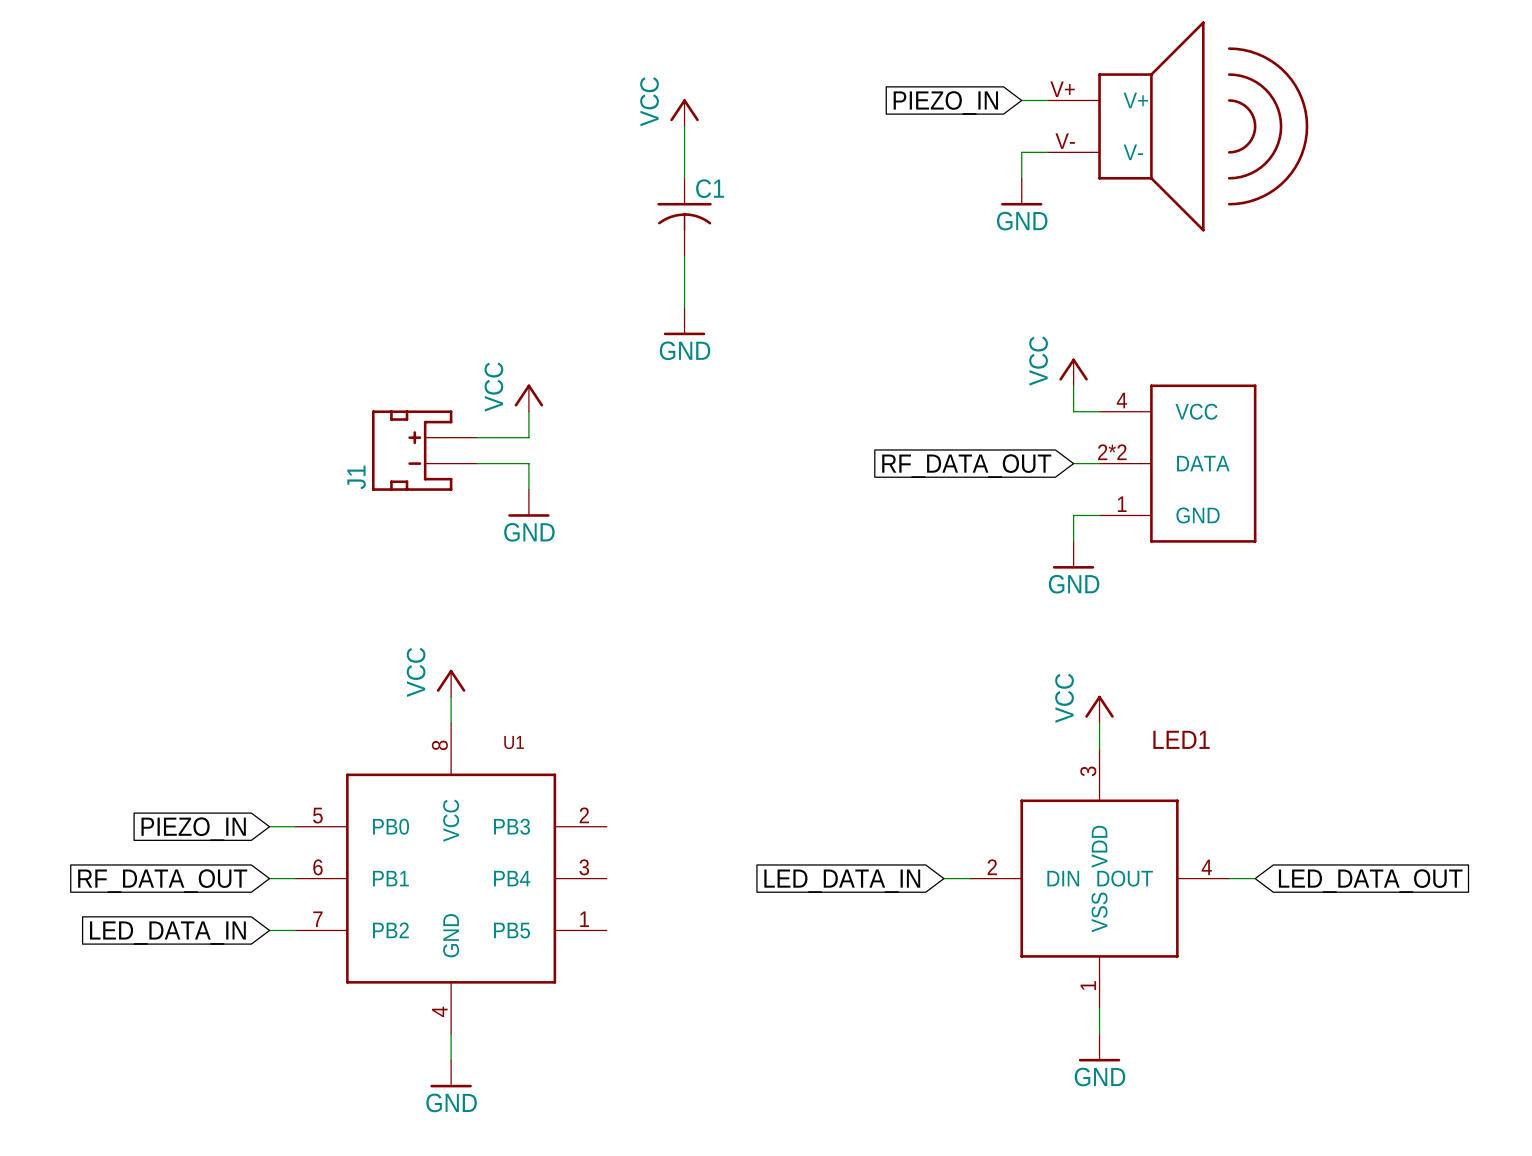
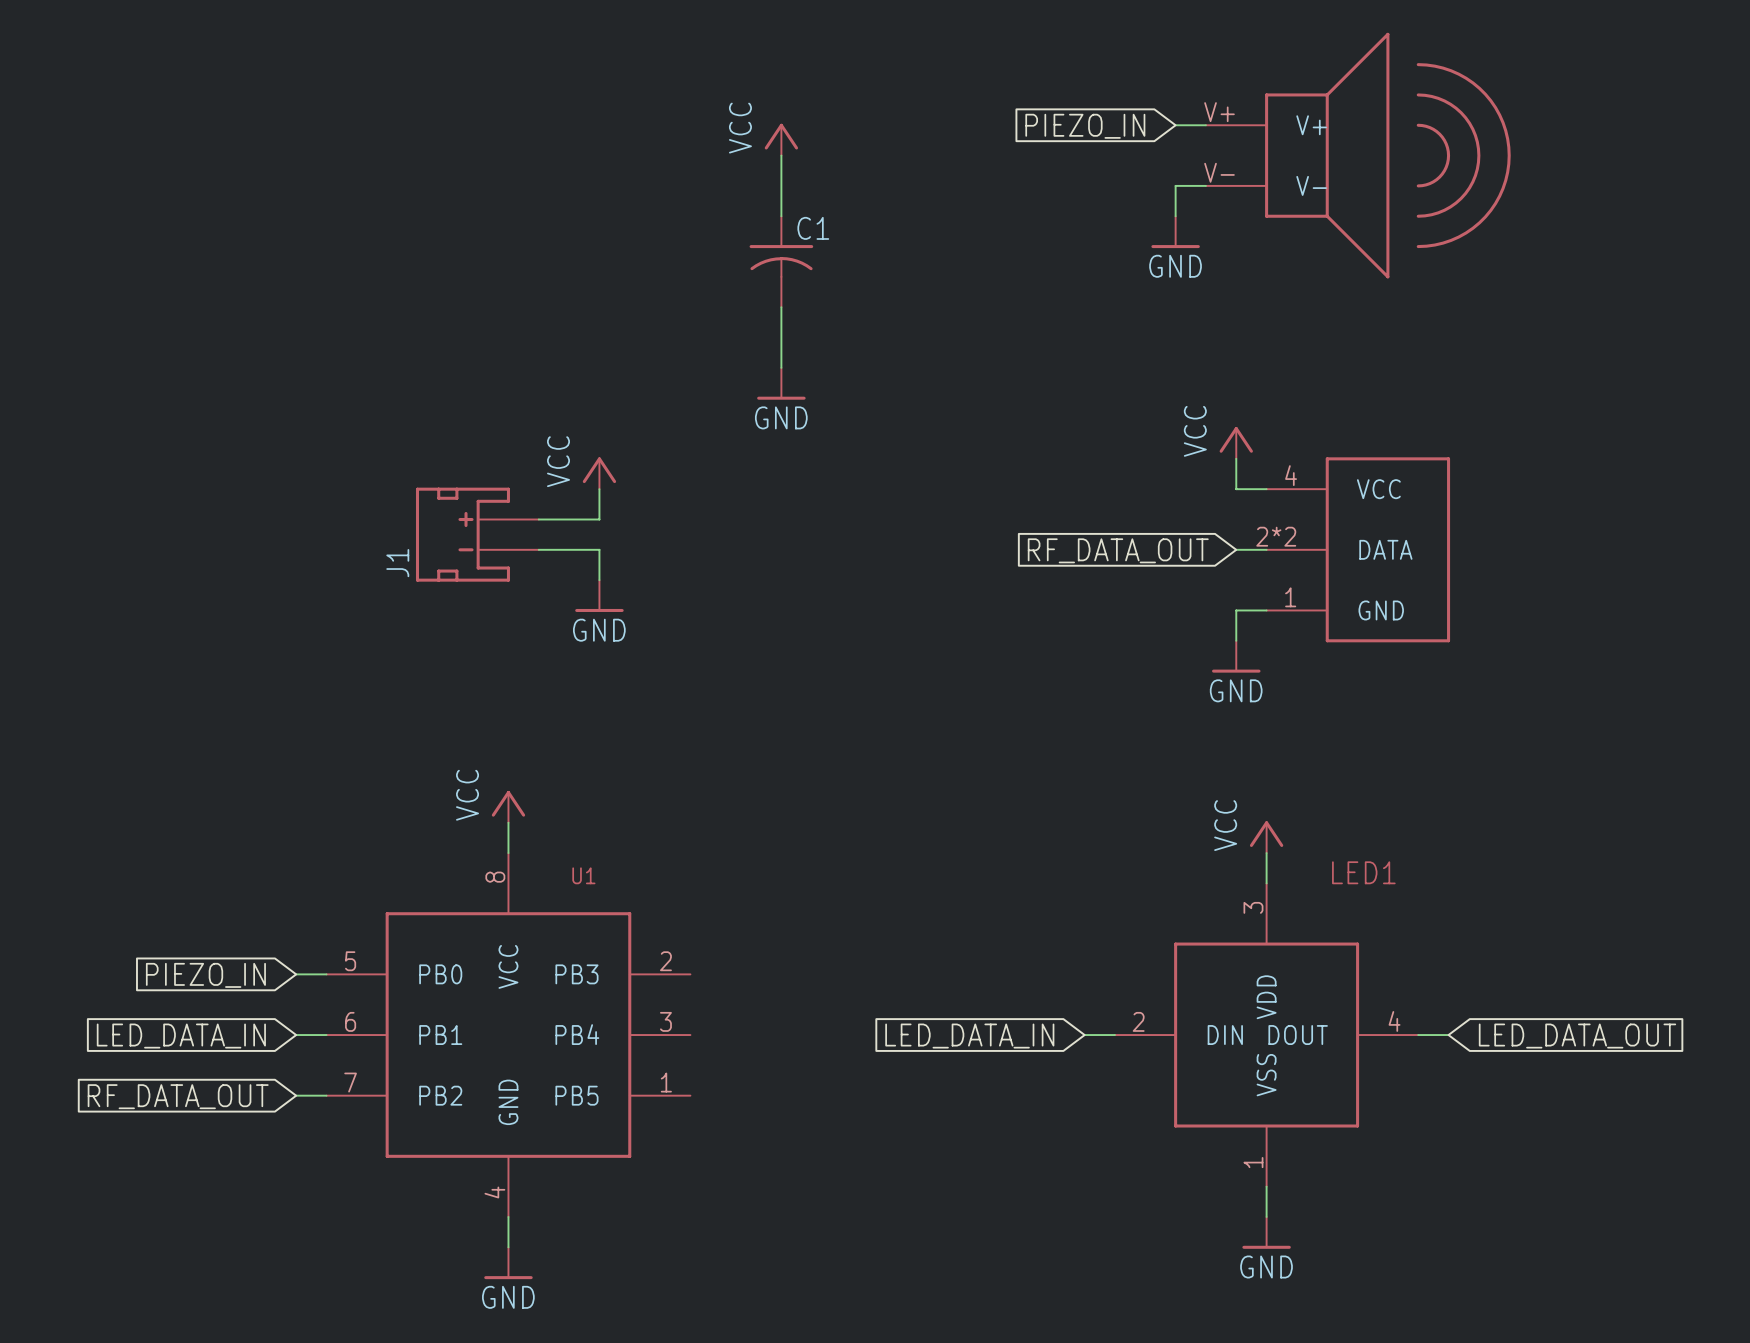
global label: RF_DATA_OUT (162, 881) -> LED_DATA_IN (181, 1036)
global label: LED_DATA_IN (167, 933) -> RF_DATA_OUT (178, 1096)

